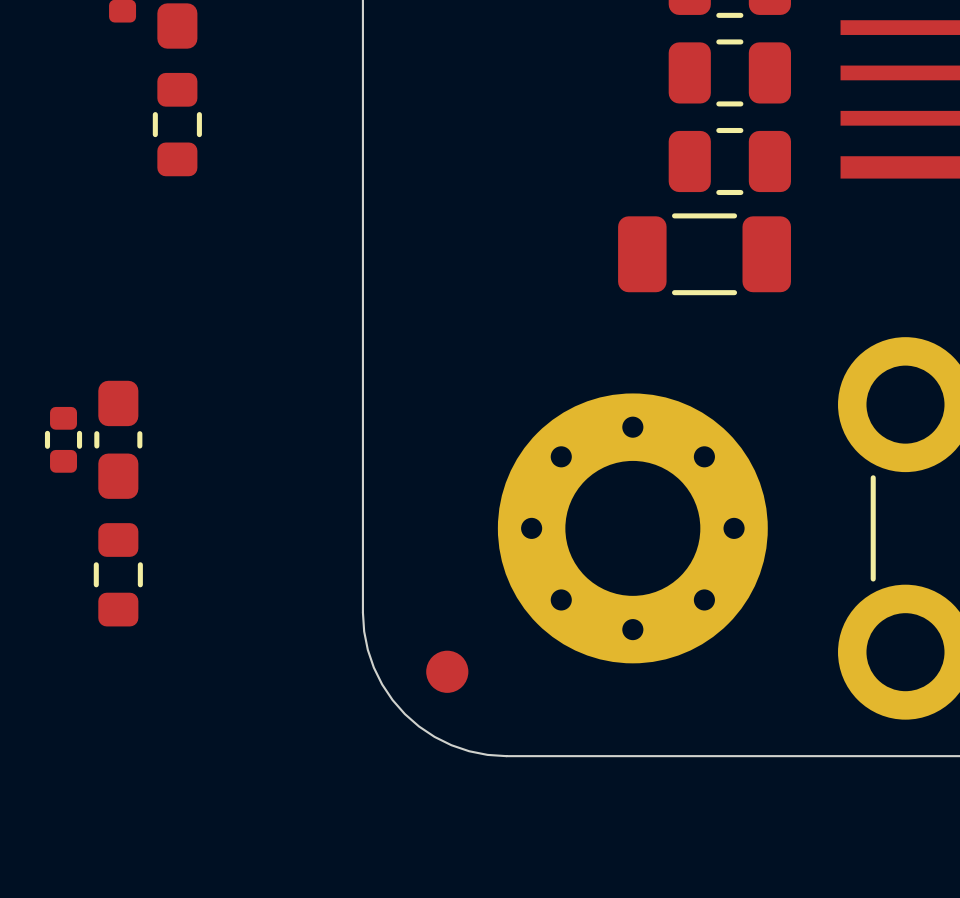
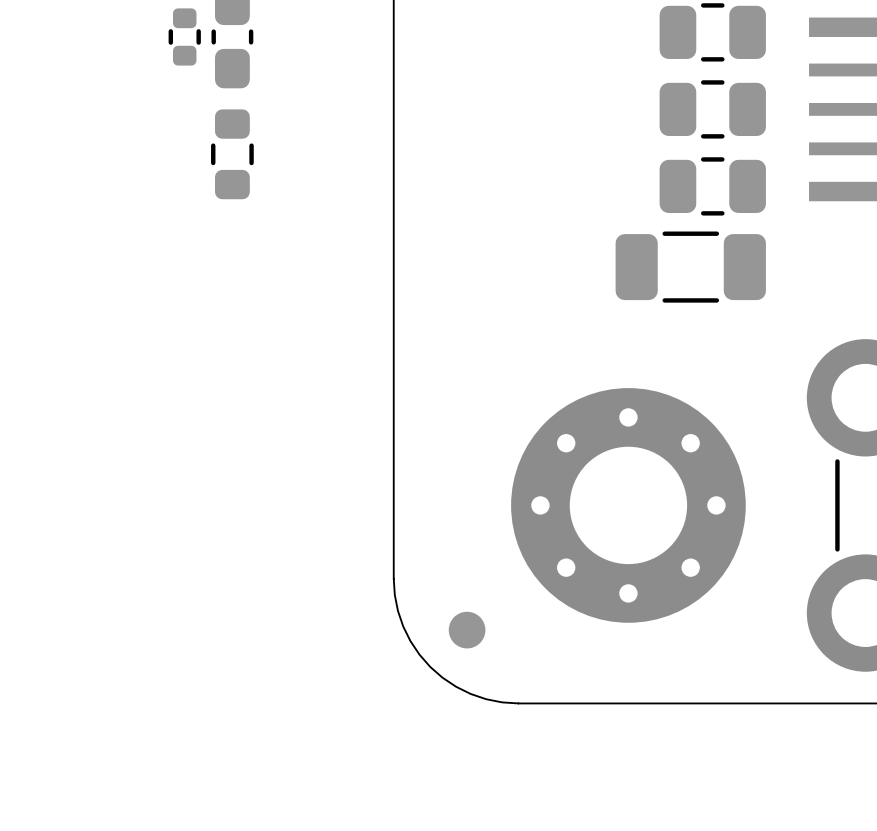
part: (63, 439) -> none
part: (118, 439) -> none
part: (118, 574) -> none

